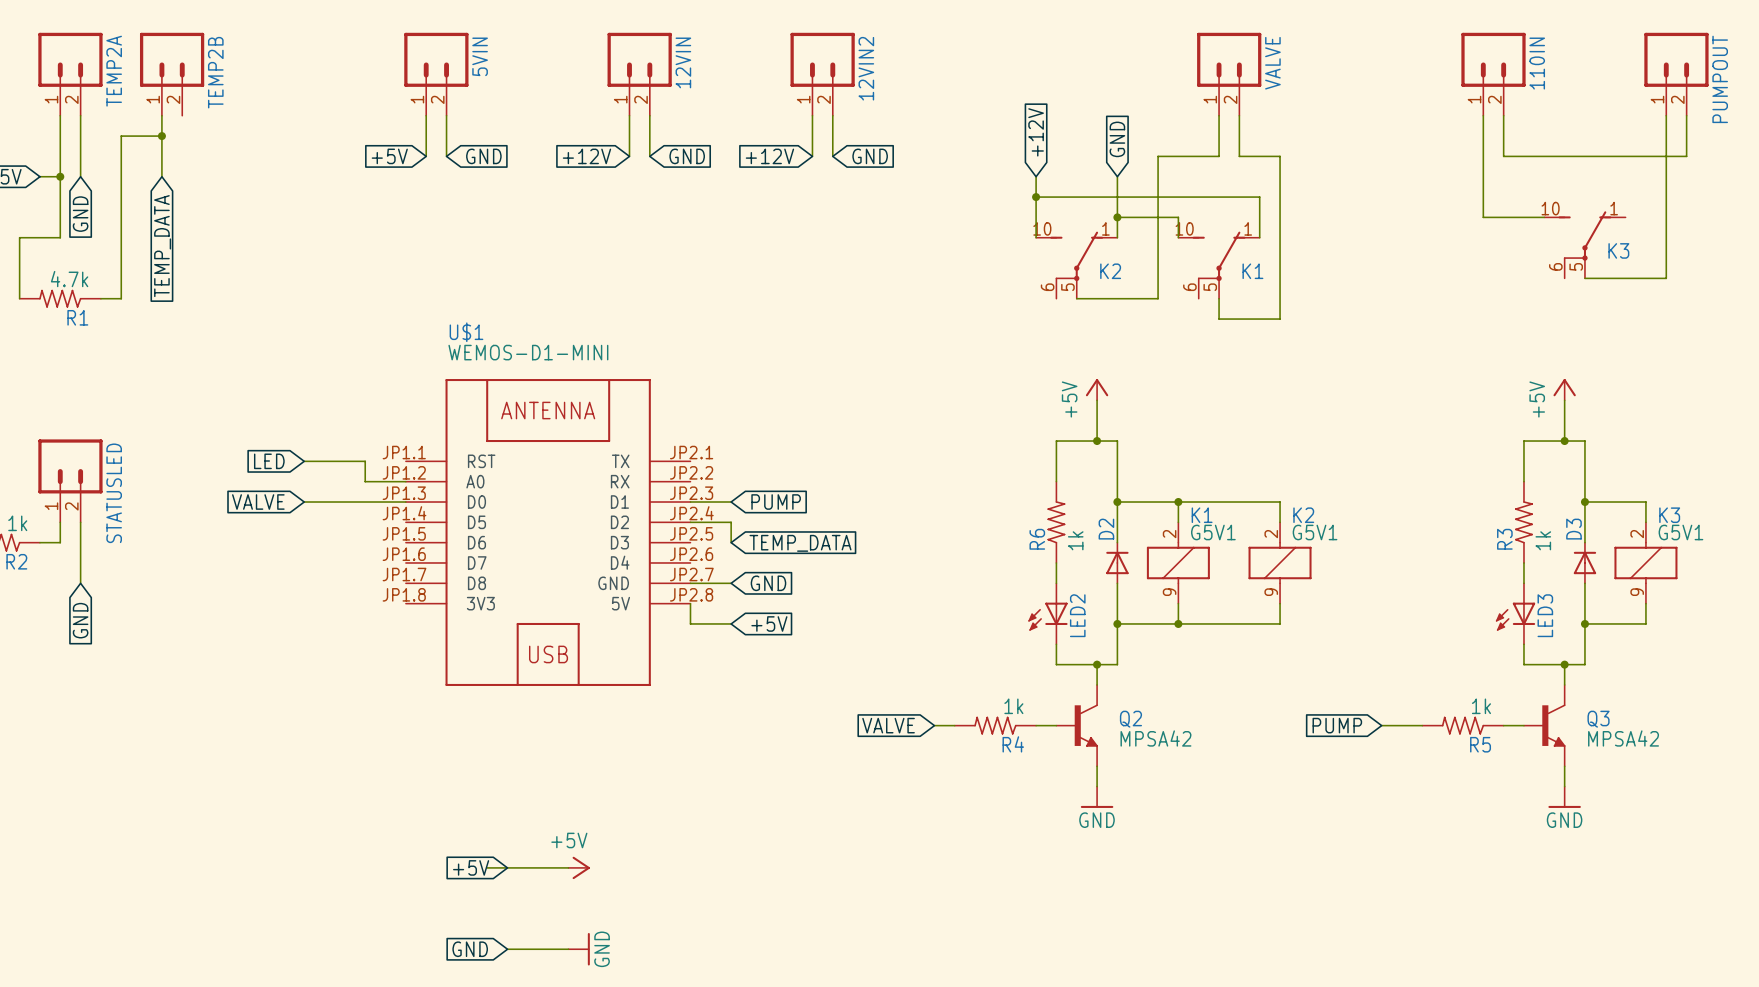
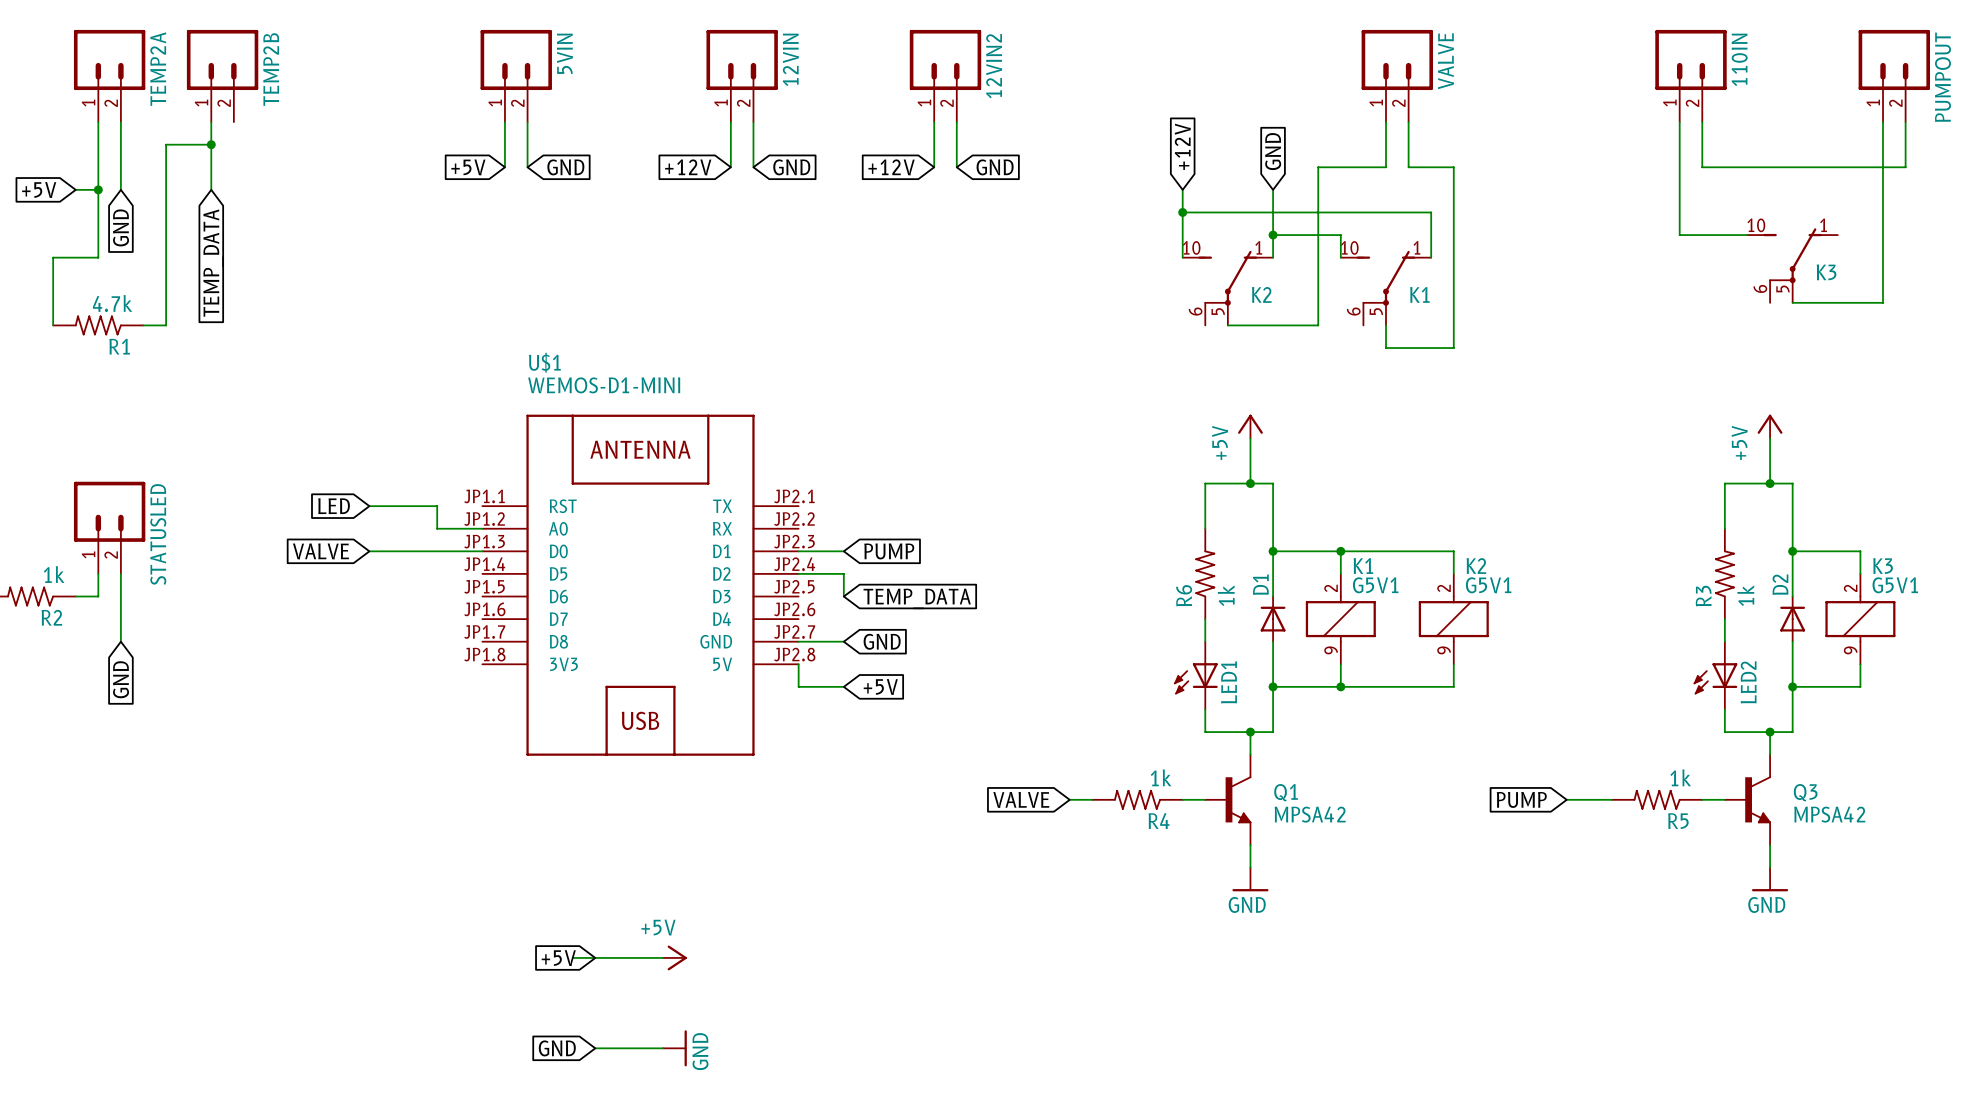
D2 name: D2 (1106, 529) -> D1 (1260, 584)
D3 name: D3 (1573, 529) -> D2 (1780, 584)
LED2 name: LED2 (1077, 615) -> LED1 (1229, 682)
LED3 name: LED3 (1545, 615) -> LED2 (1748, 682)
Q2 name: Q2 (1130, 719) -> Q1 (1286, 792)

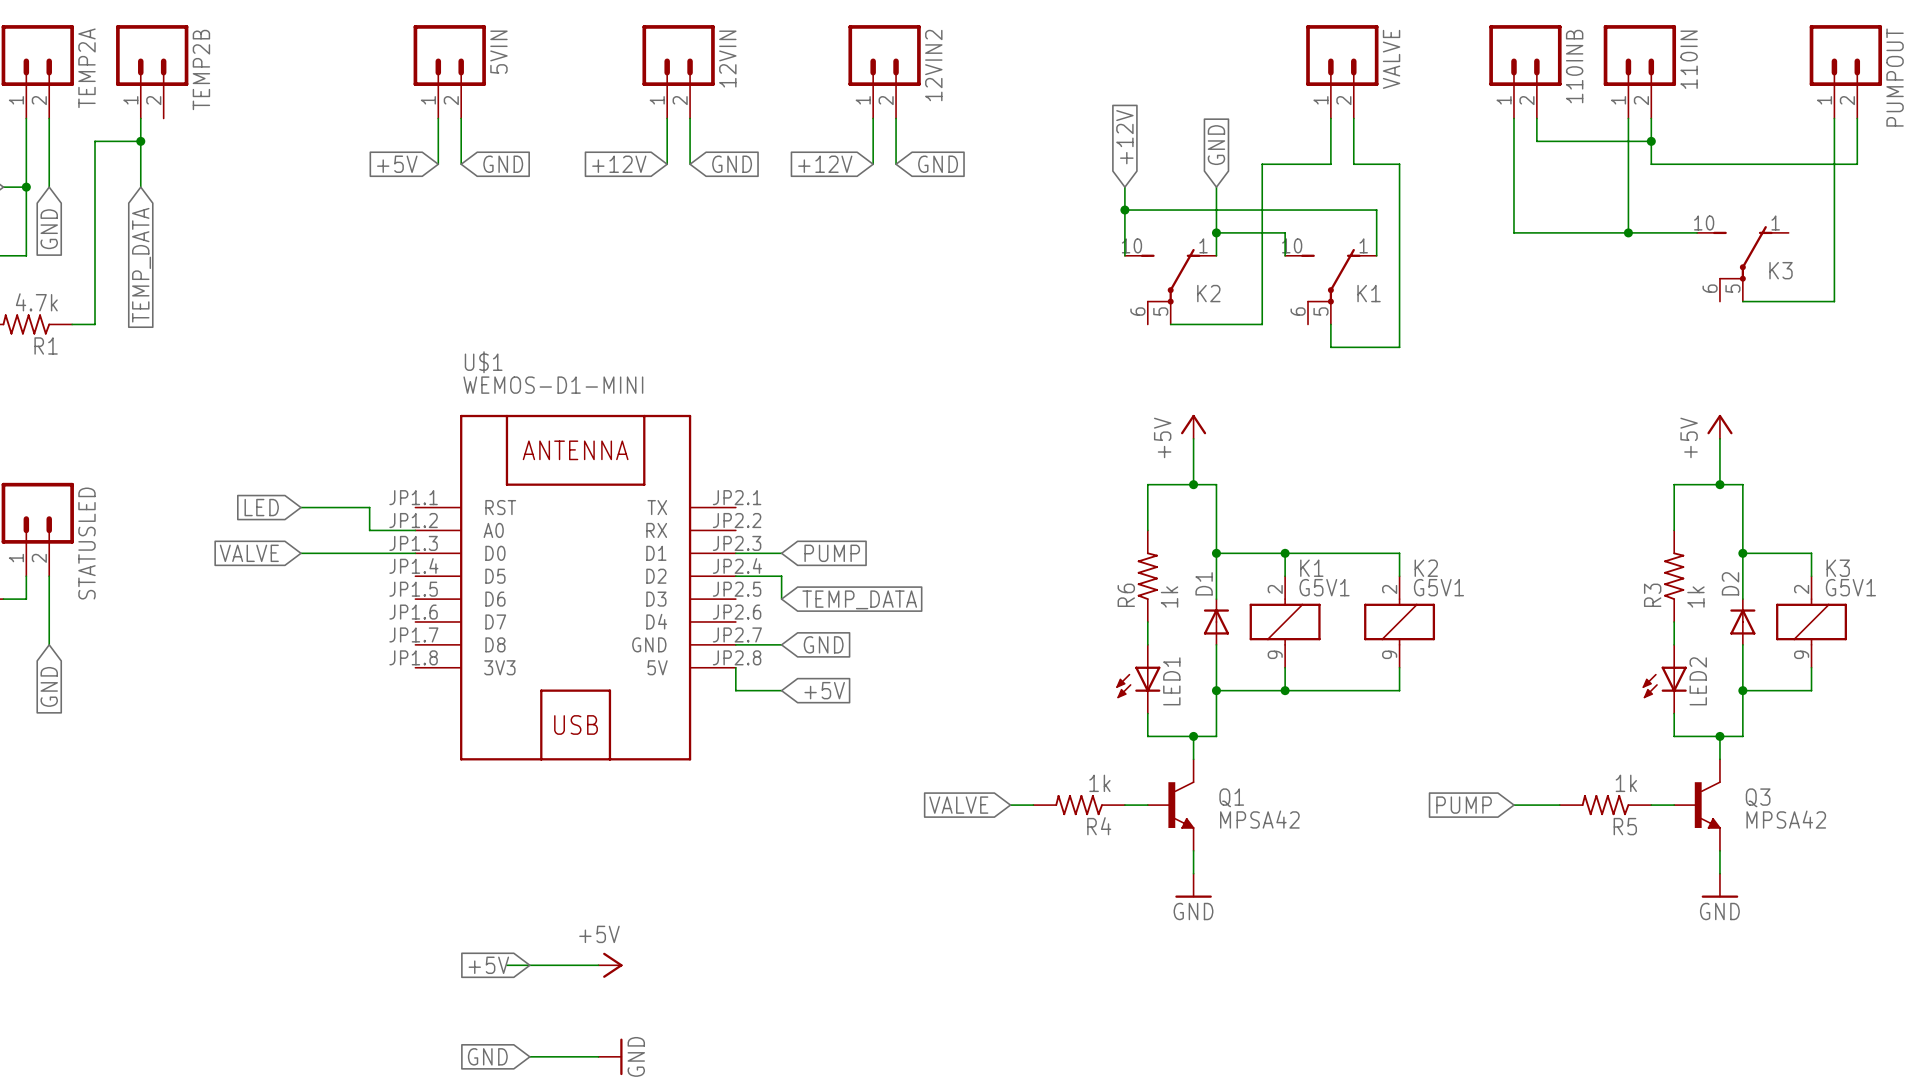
110INB: none -> (1525, 71)
wire: none -> (1513, 118) (1513, 232) (1628, 232)
wire: none -> (1536, 118) (1536, 141) (1651, 141)
junction: none -> (1651, 141)
junction: none -> (1628, 232)

